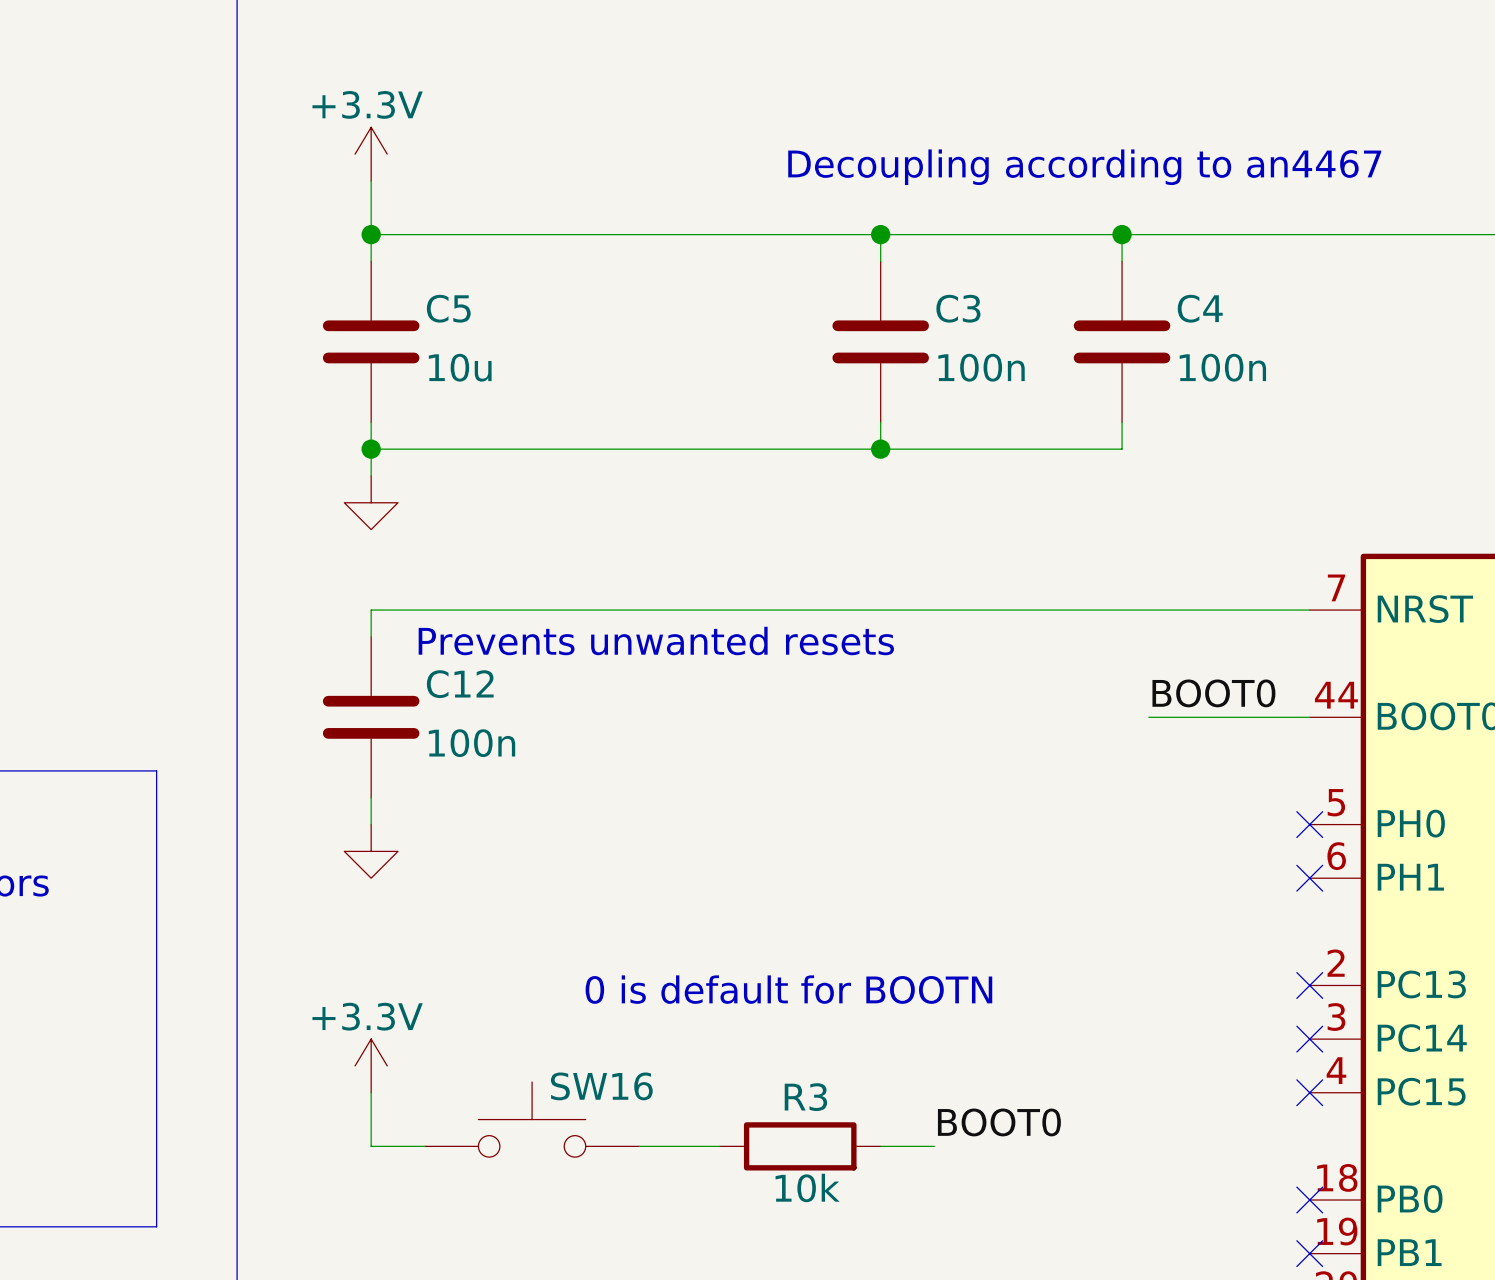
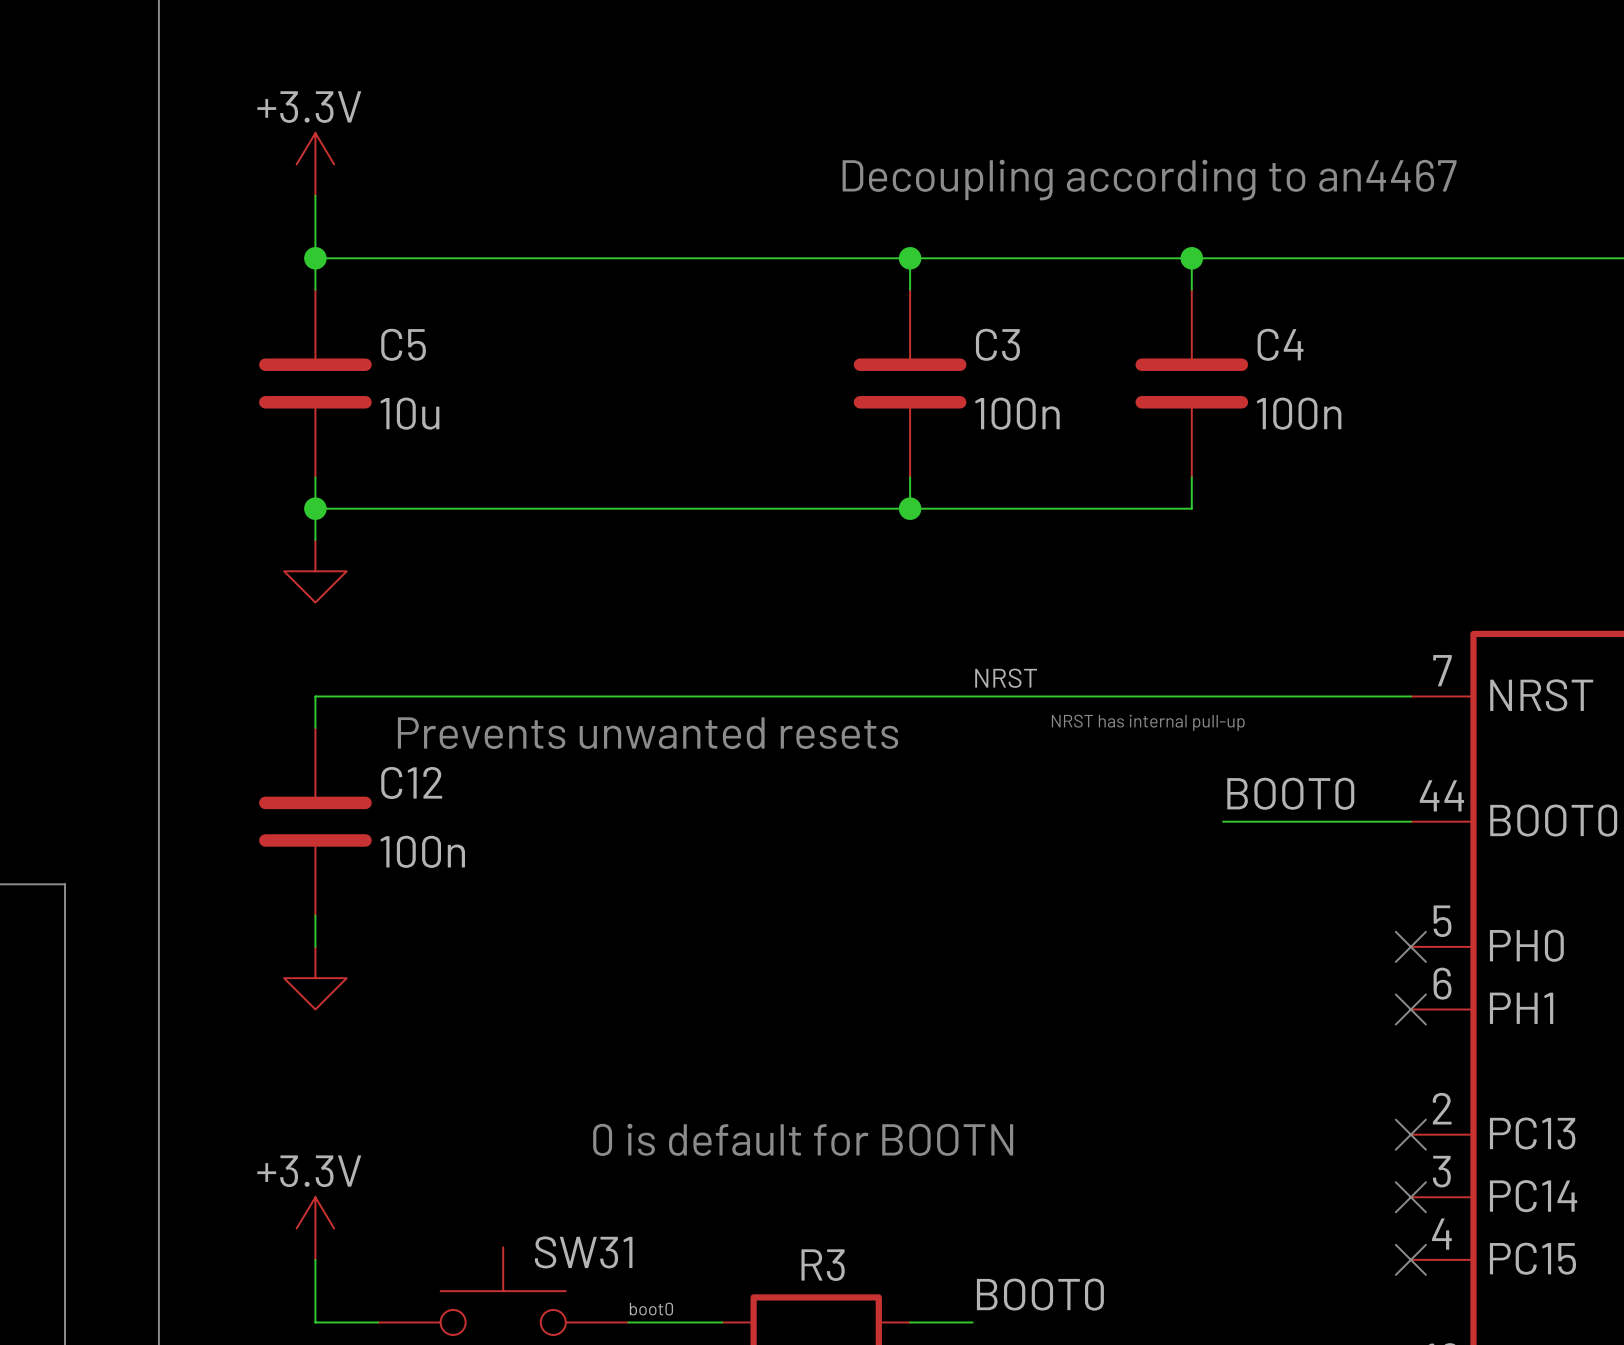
label: none -> NRST (1006, 678)
text: none -> NRST has internal pull-up (1148, 722)
SW16 name: SW16 (601, 1086) -> SW31 (583, 1252)
label: none -> boot0 (651, 1309)

